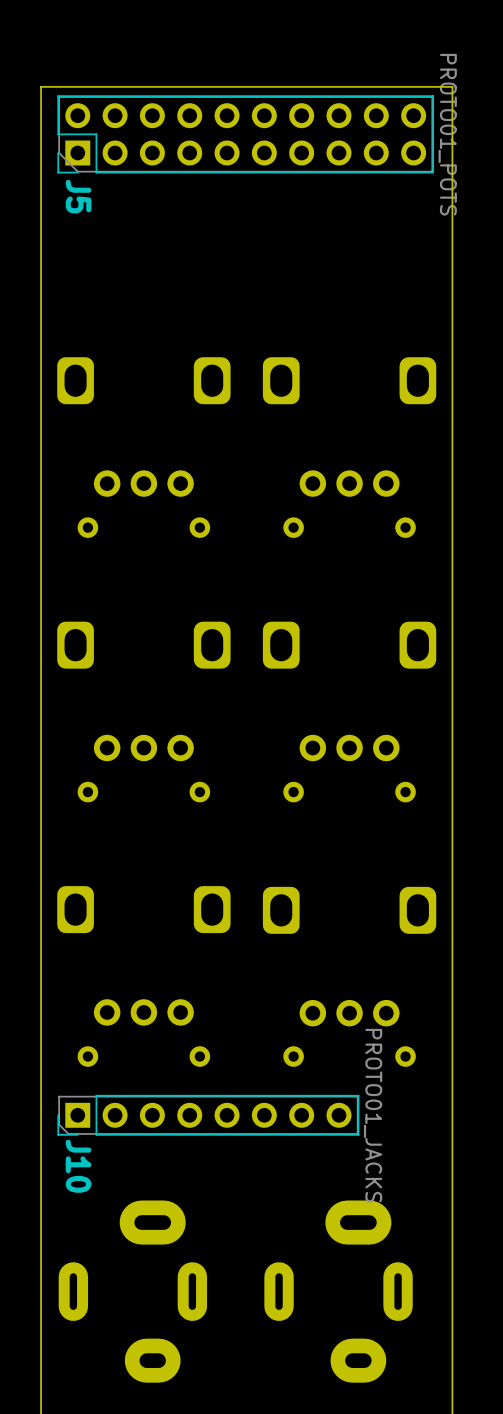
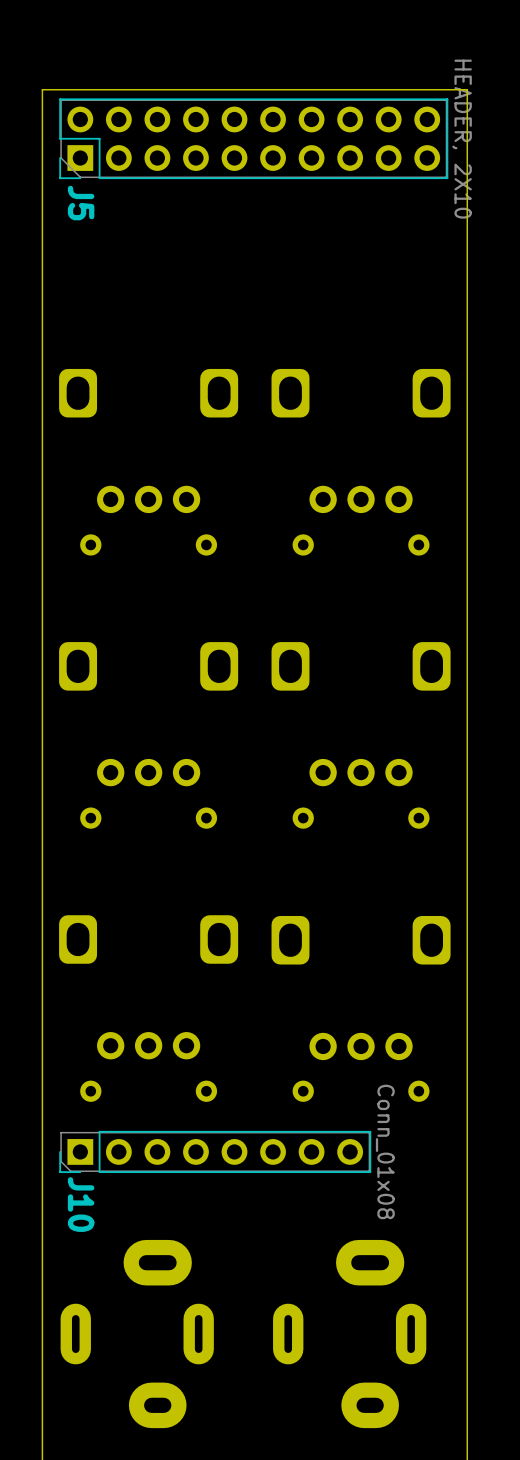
J5 value: PROTO01_POTS (447, 134) -> HEADER, 2X10 (462, 139)
J10 value: PROTO01_JACKS (373, 1115) -> Conn_01x08 (385, 1151)

